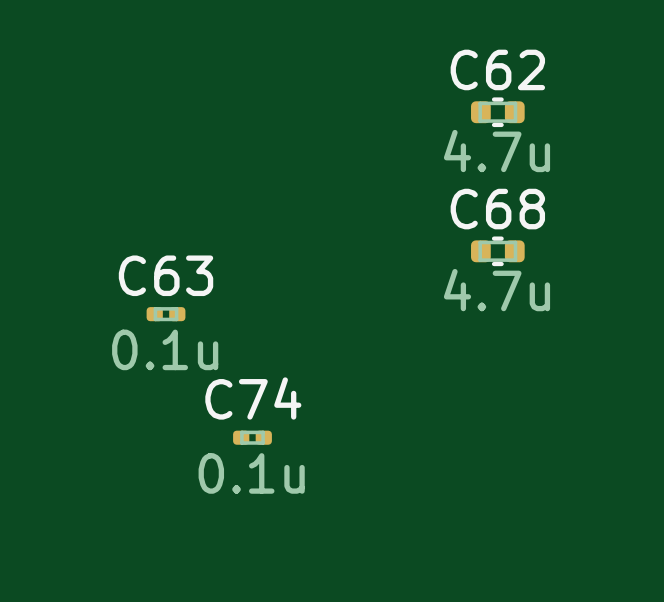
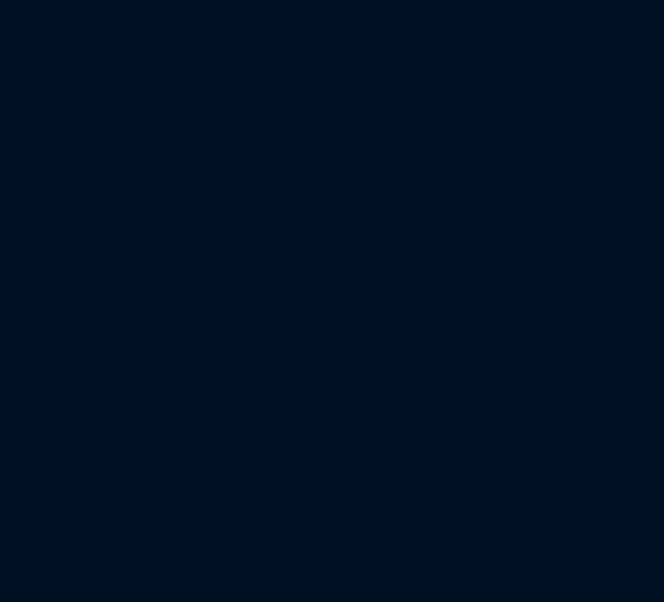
C62: 4.7u (497, 112) -> none
C68: 4.7u (497, 251) -> none
C63: 0.1u (166, 314) -> none
C74: 0.1u (252, 437) -> none

